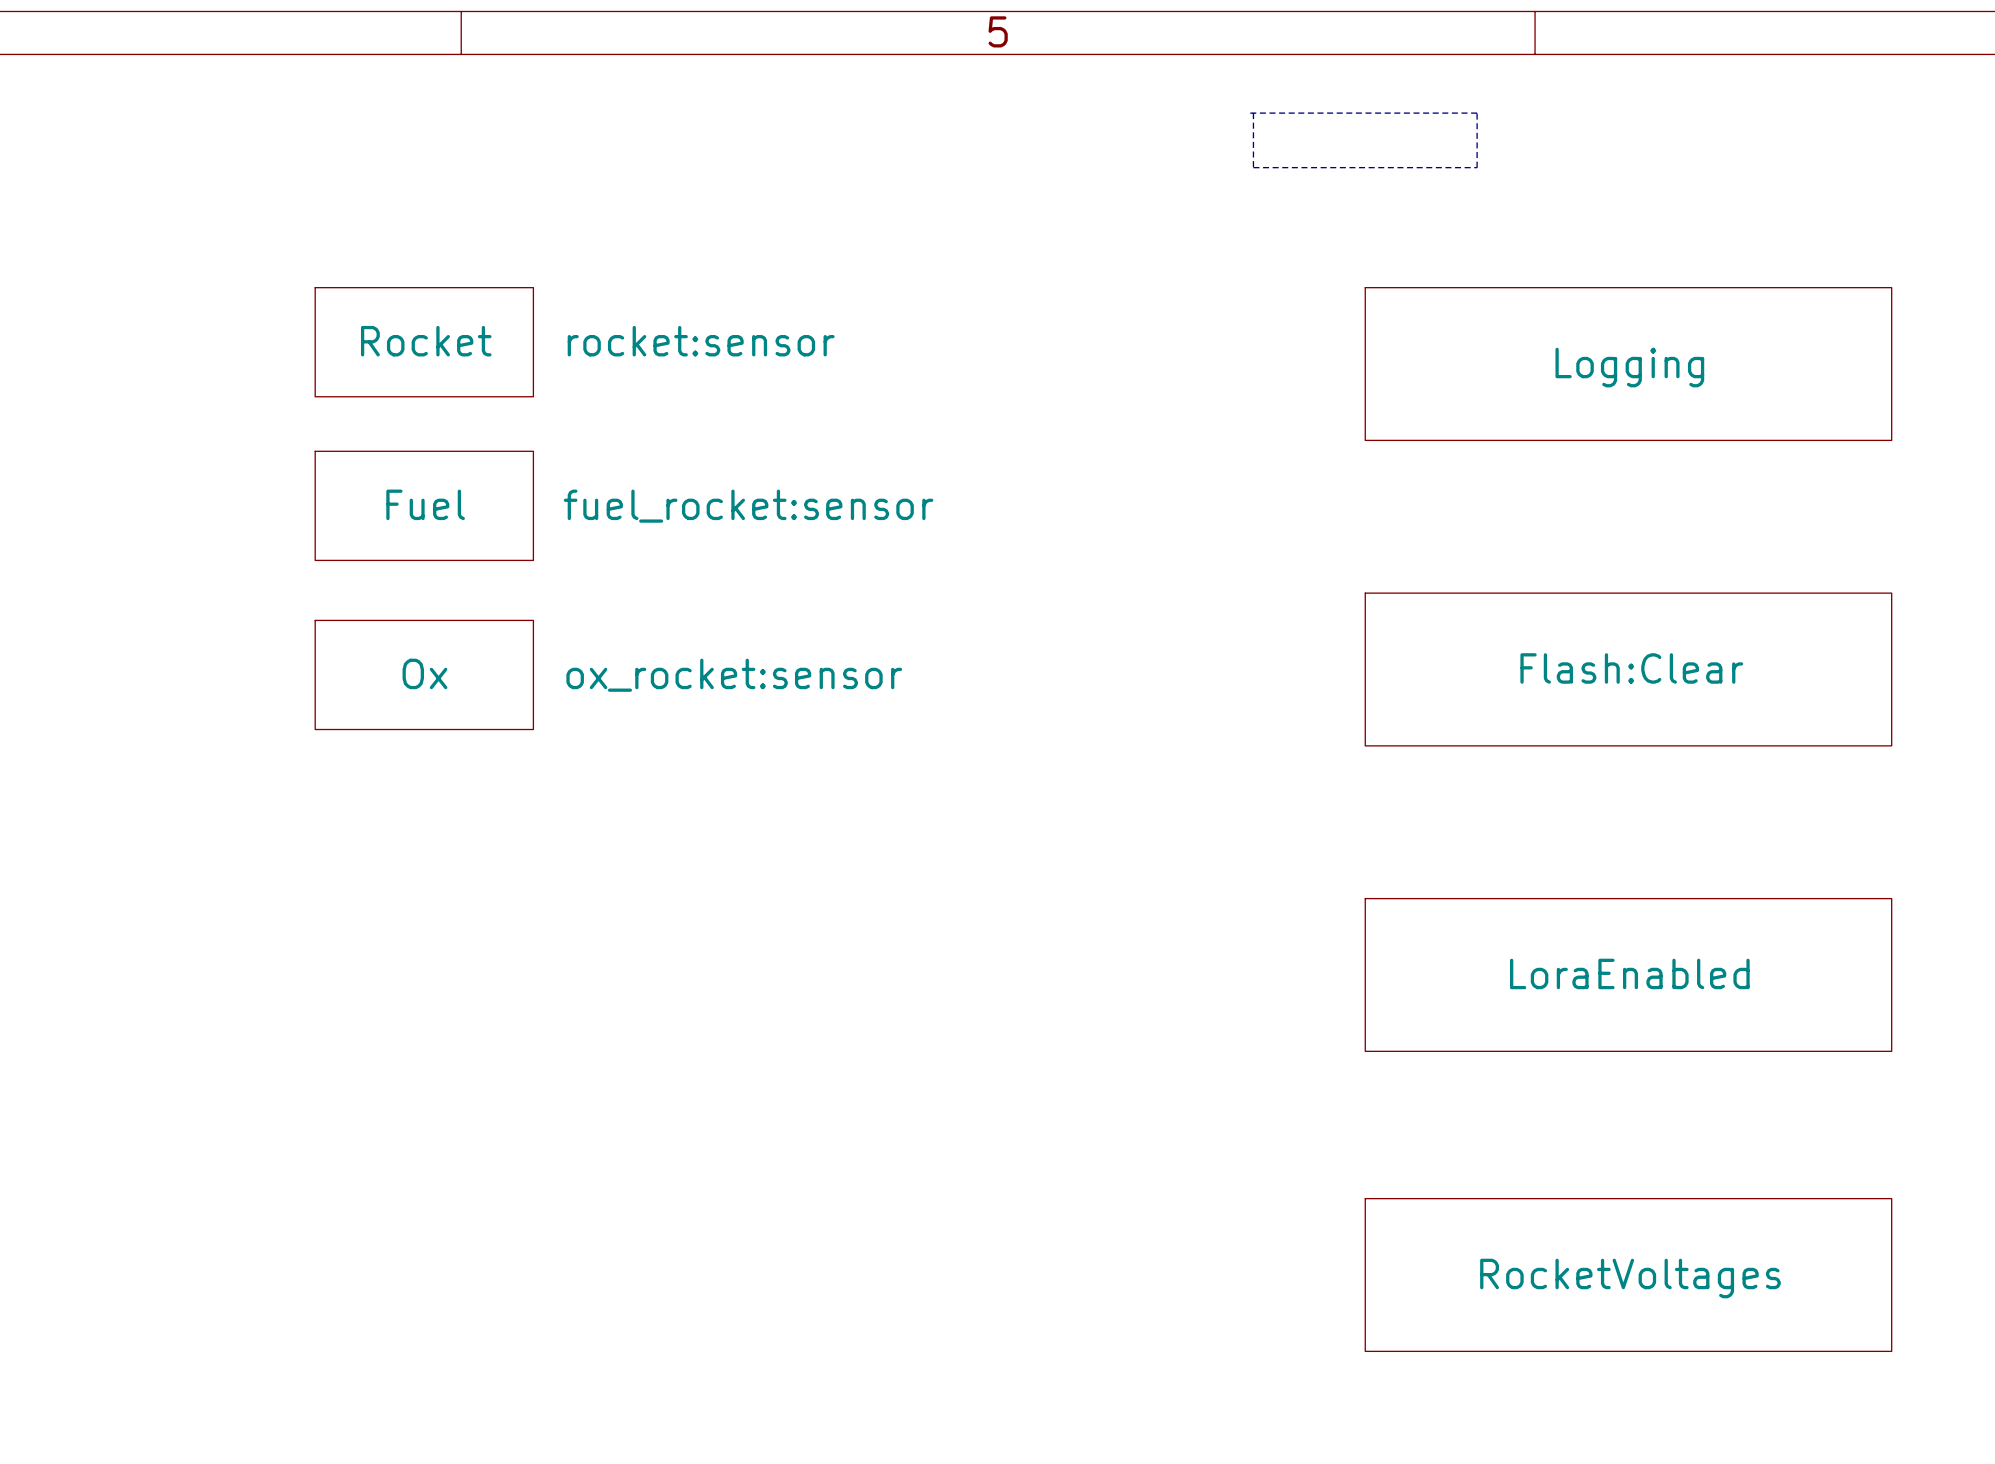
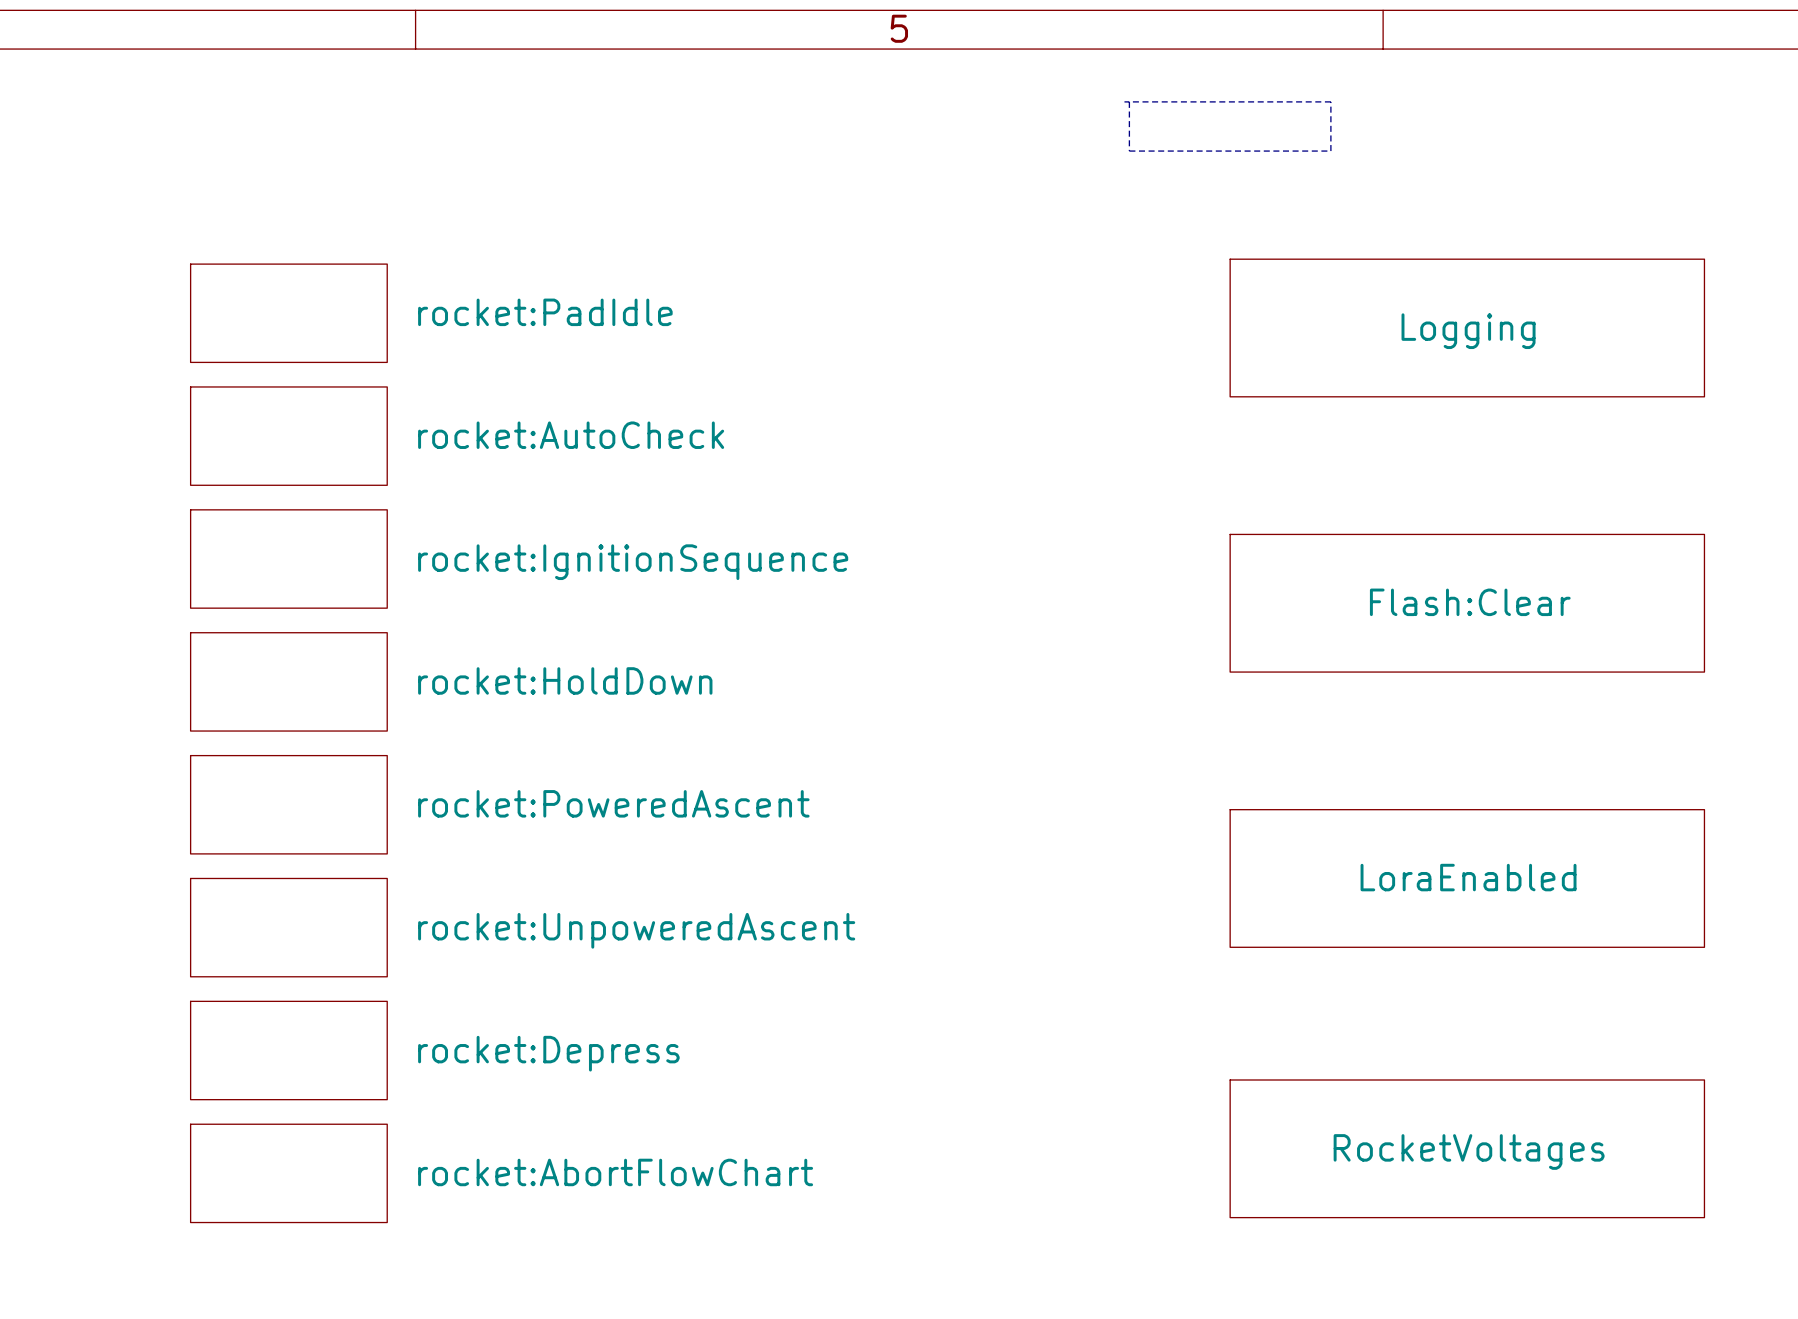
Rocket: rocket:sensor (424, 342) -> none
part: none -> rocket:PadIdle (288, 313)
part: none -> rocket:AutoCheck (288, 436)
Fuel: fuel_rocket:sensor (424, 505) -> none
part: none -> rocket:IgnitionSequence (288, 559)
Ox: ox_rocket:sensor (424, 674) -> none
part: none -> rocket:HoldDown (288, 681)
part: none -> rocket:PoweredAscent (288, 804)
part: none -> rocket:UnpoweredAscent (288, 927)
part: none -> rocket:Depress (288, 1050)
part: none -> rocket:AbortFlowChart (288, 1173)

